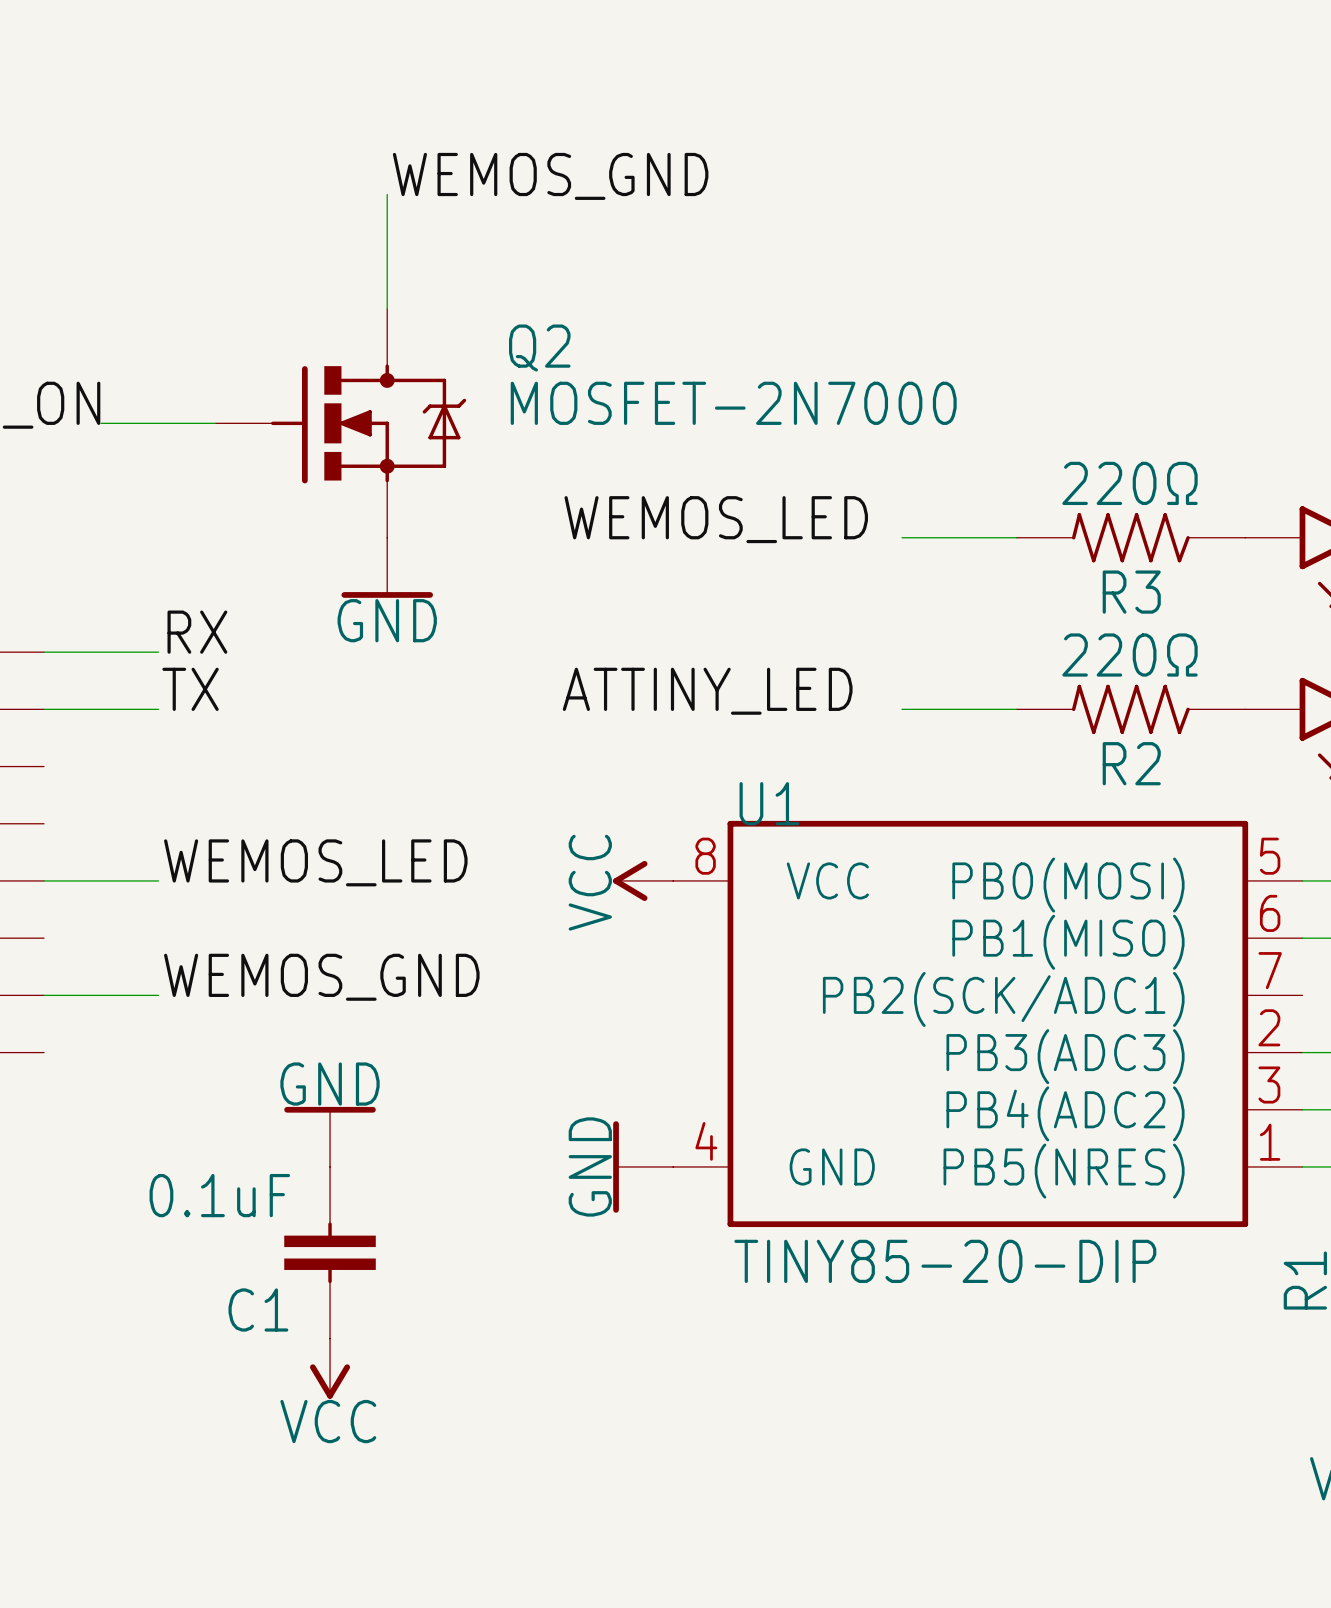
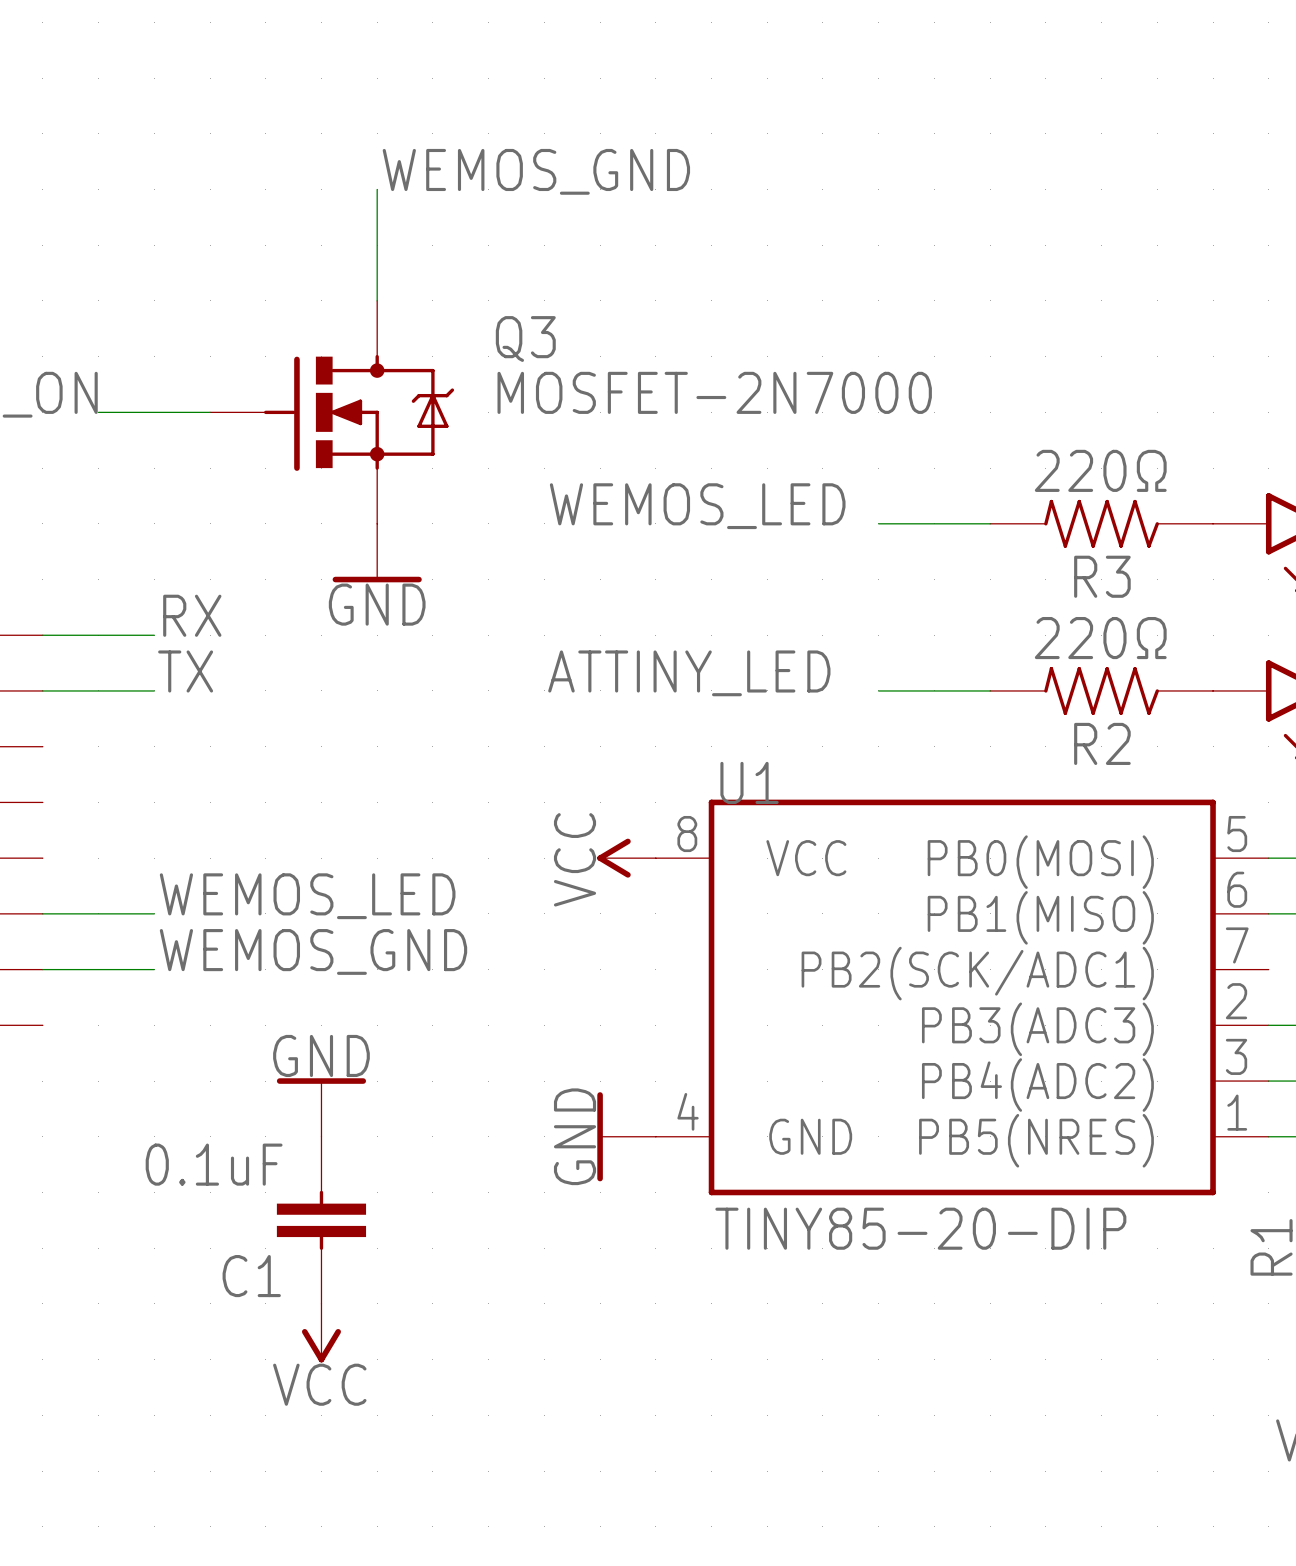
Q2 name: Q2 (539, 348) -> Q3 (525, 339)
label position: WEMOS_LED (315, 862) -> WEMOS_LED (307, 896)
wire: (44, 880) (158, 880) -> (42, 913) (154, 913)

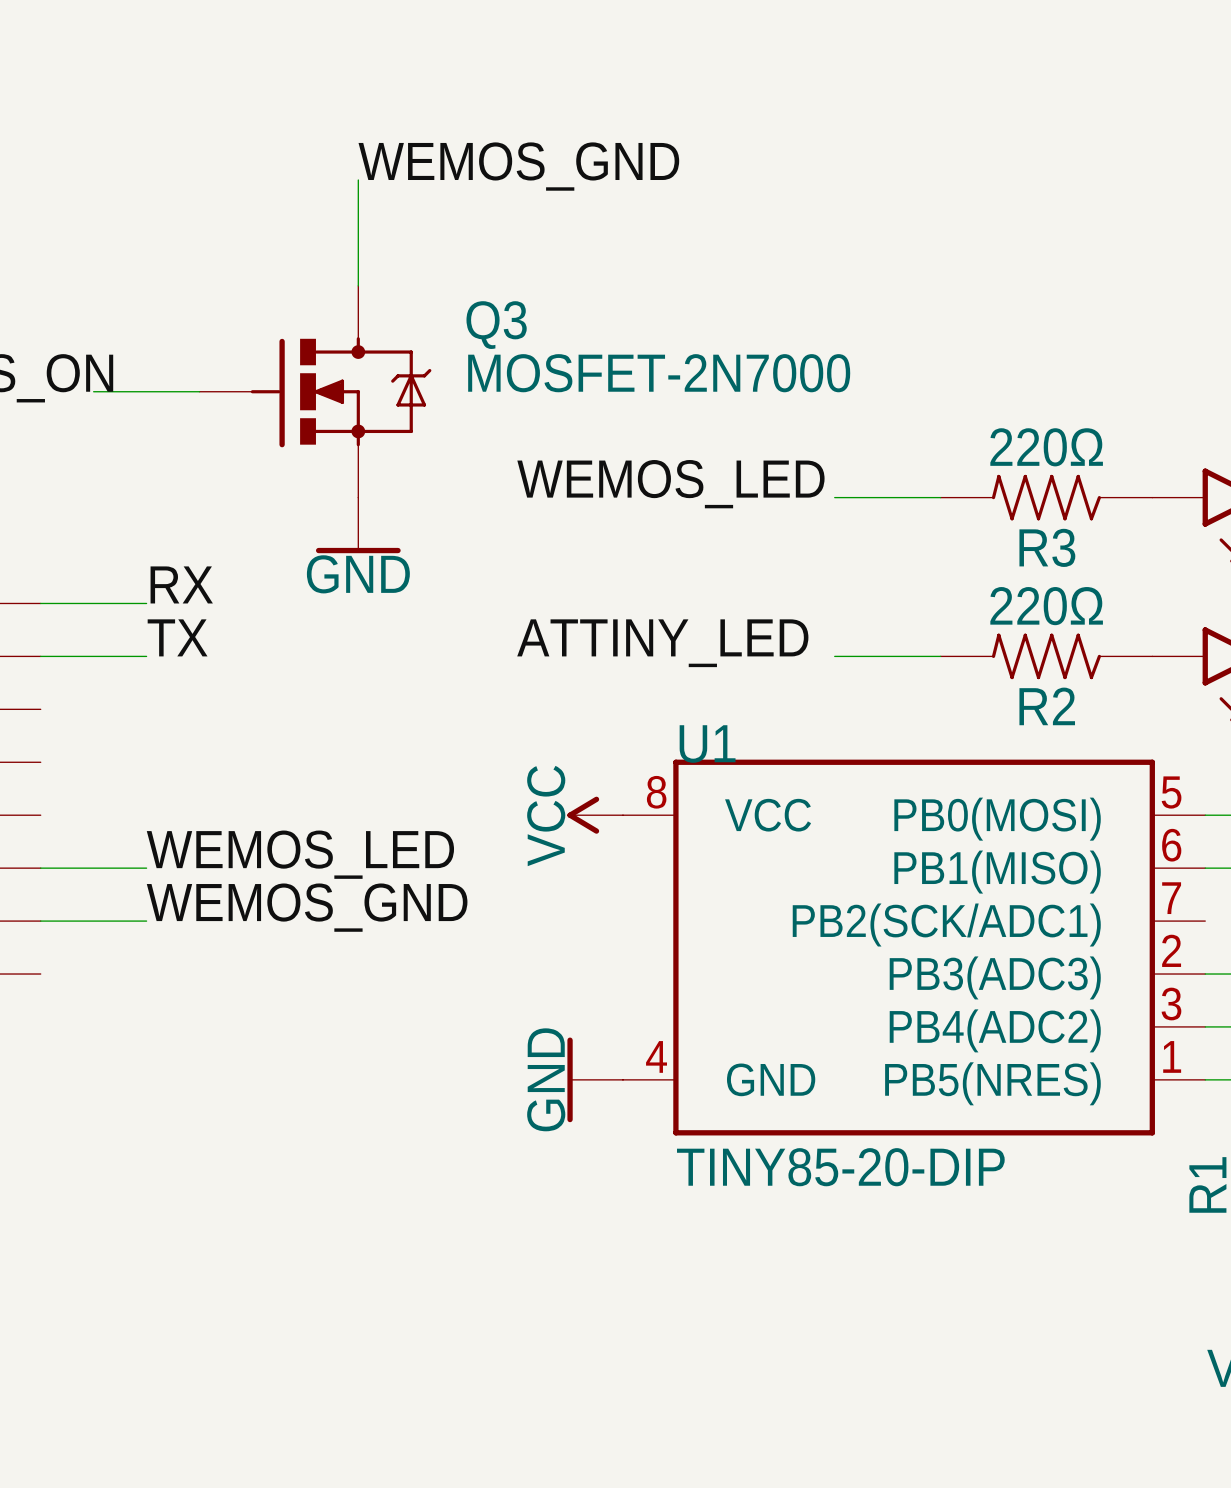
power symbol: GND (321, 1107) -> none
C1: 0.1uF (321, 1220) -> none
power symbol: VCC (321, 1333) -> none

